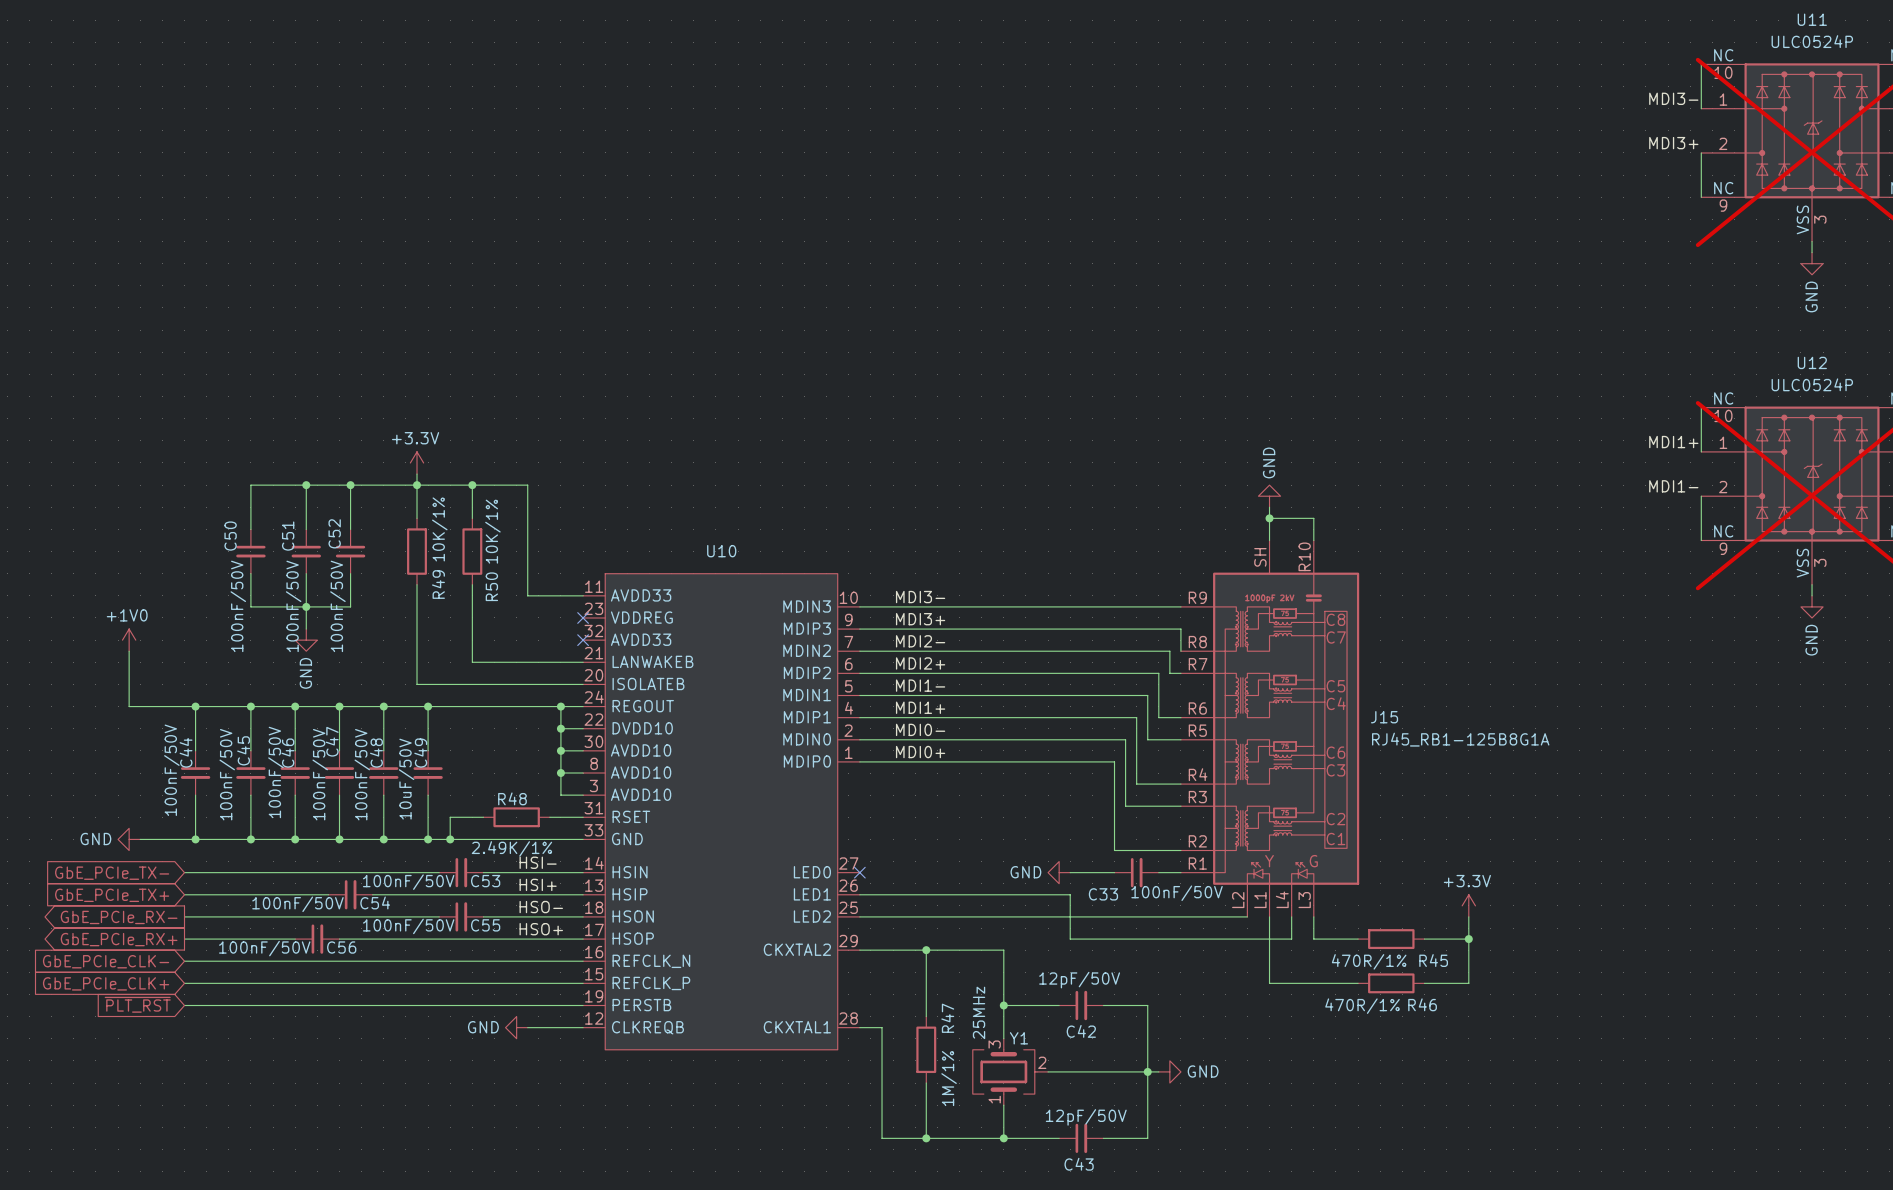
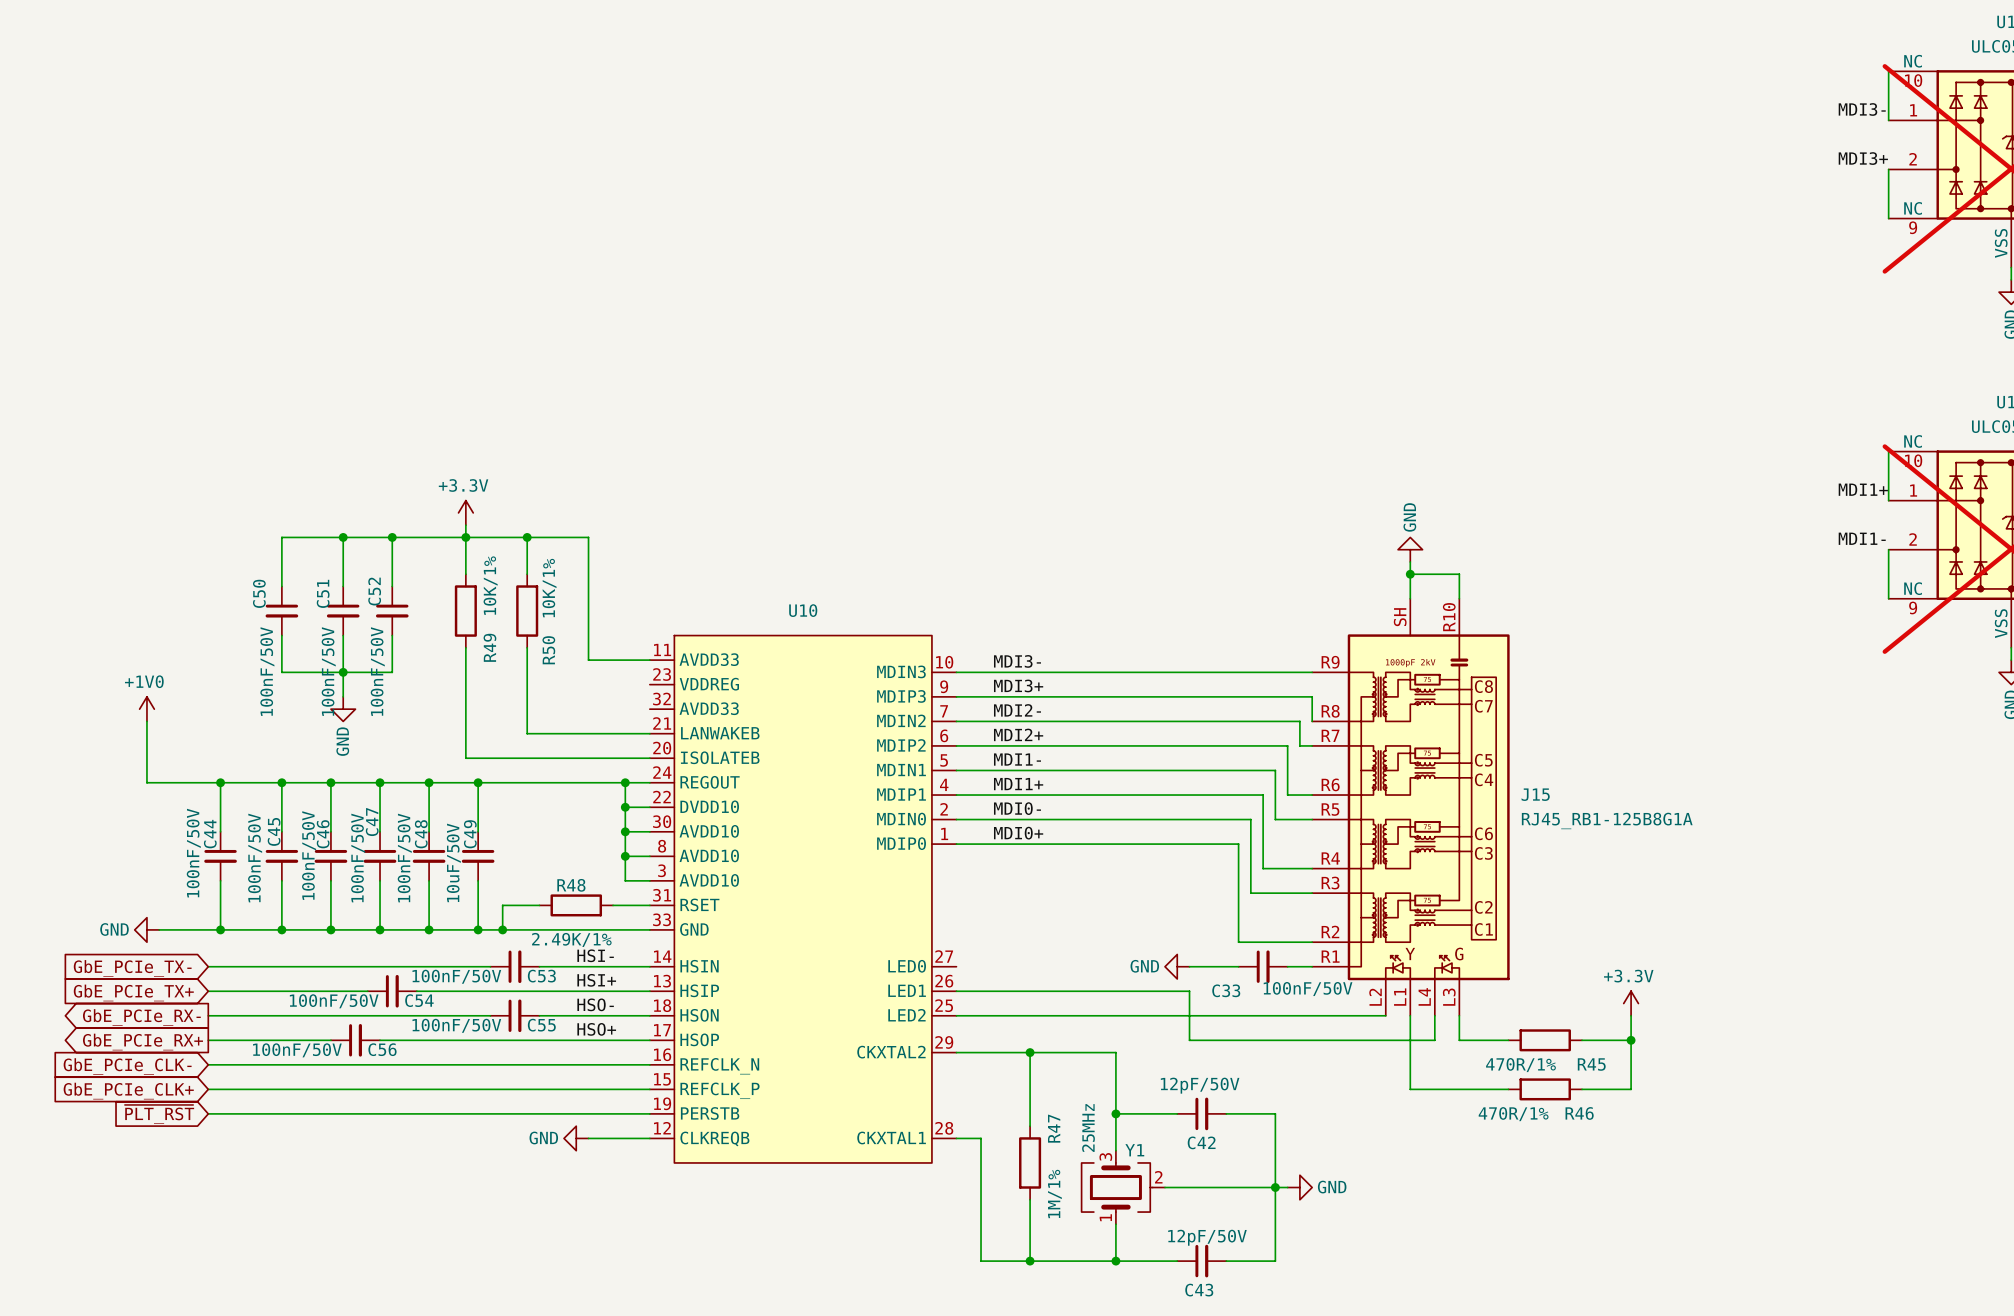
no-connect mark: (583, 617) -> none
no-connect mark: (583, 640) -> none
no-connect mark: (859, 872) -> none

